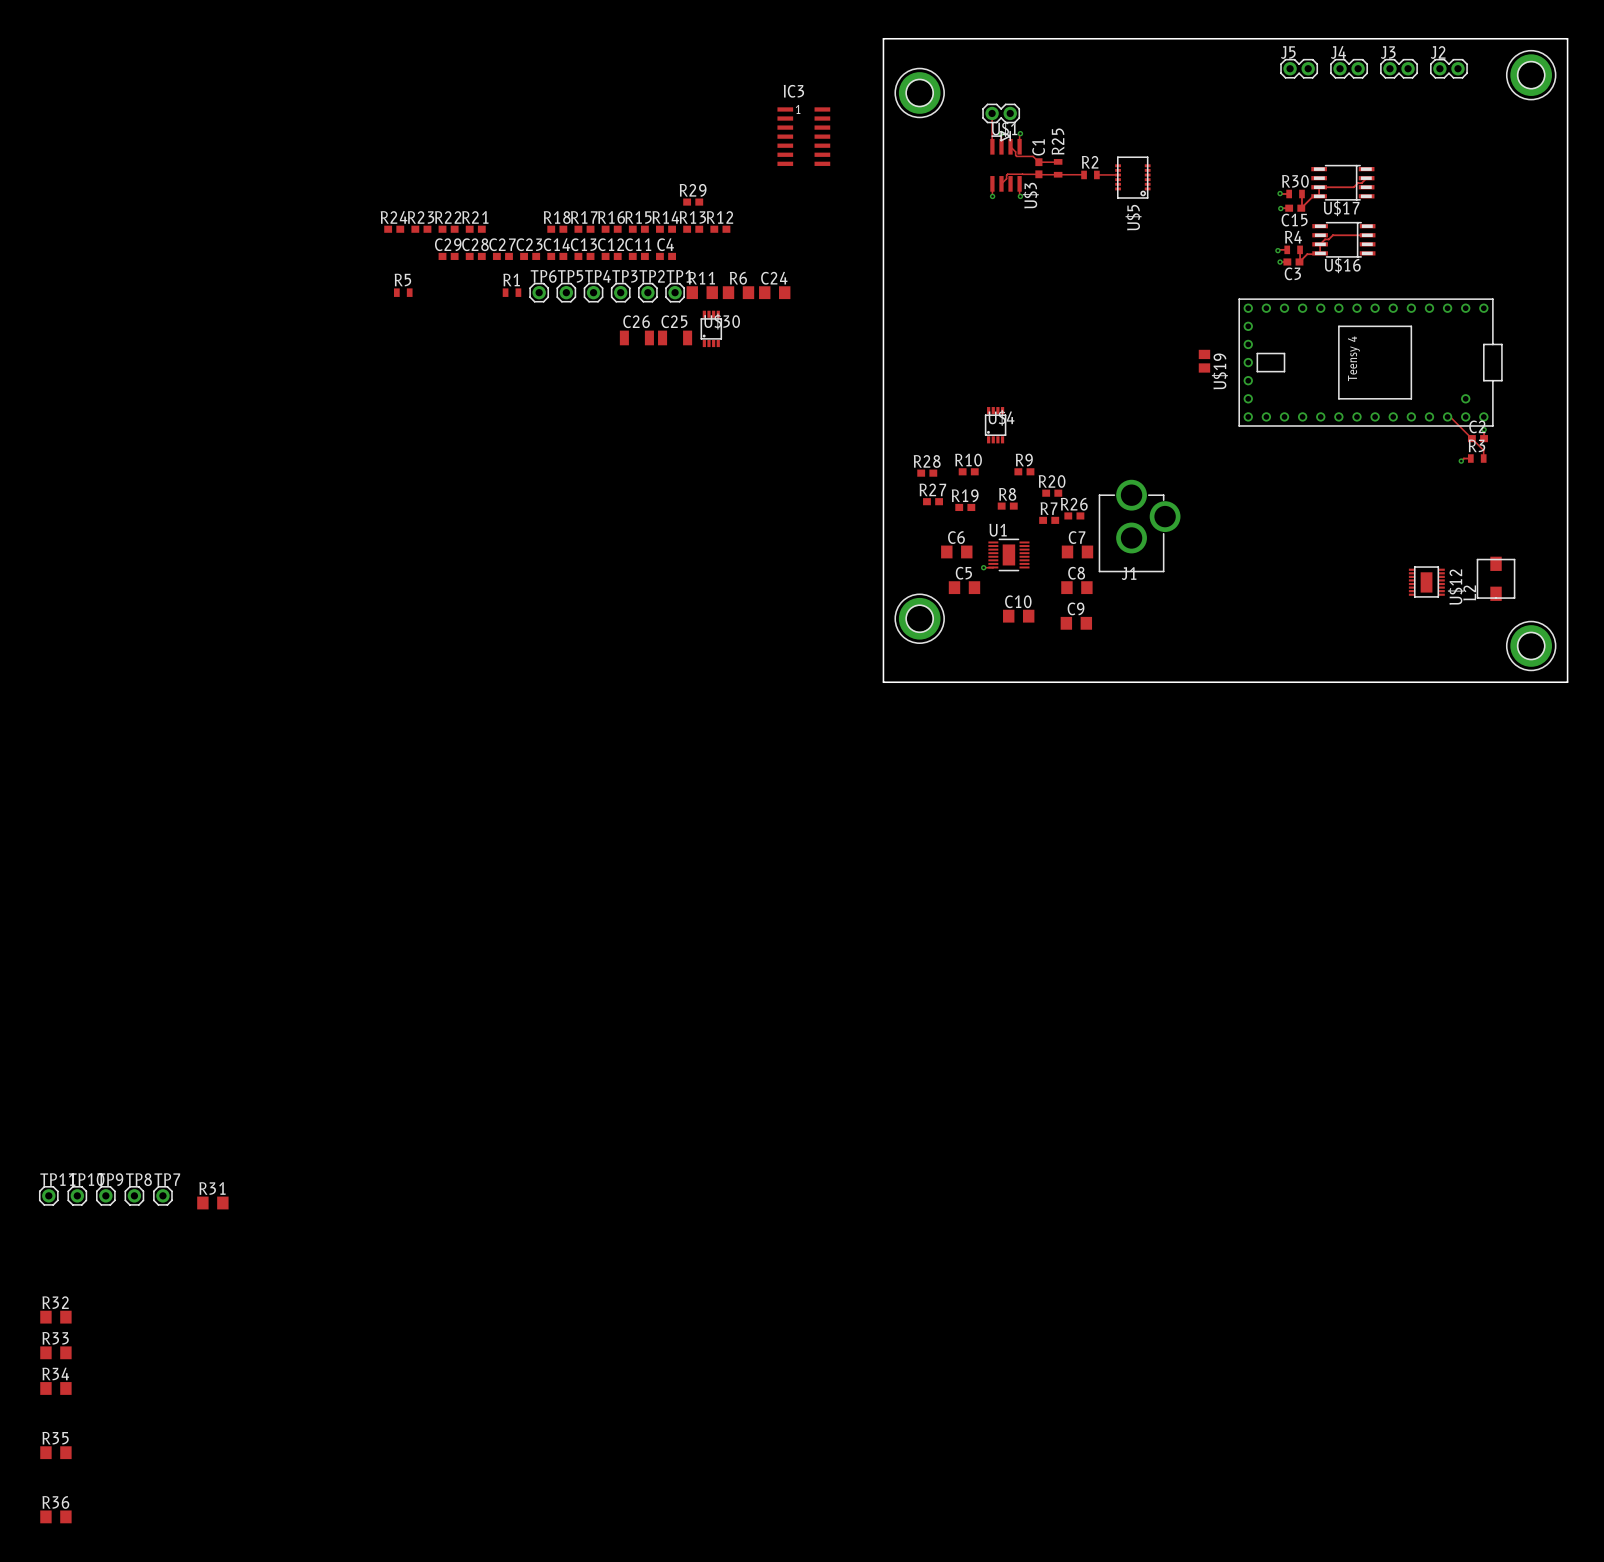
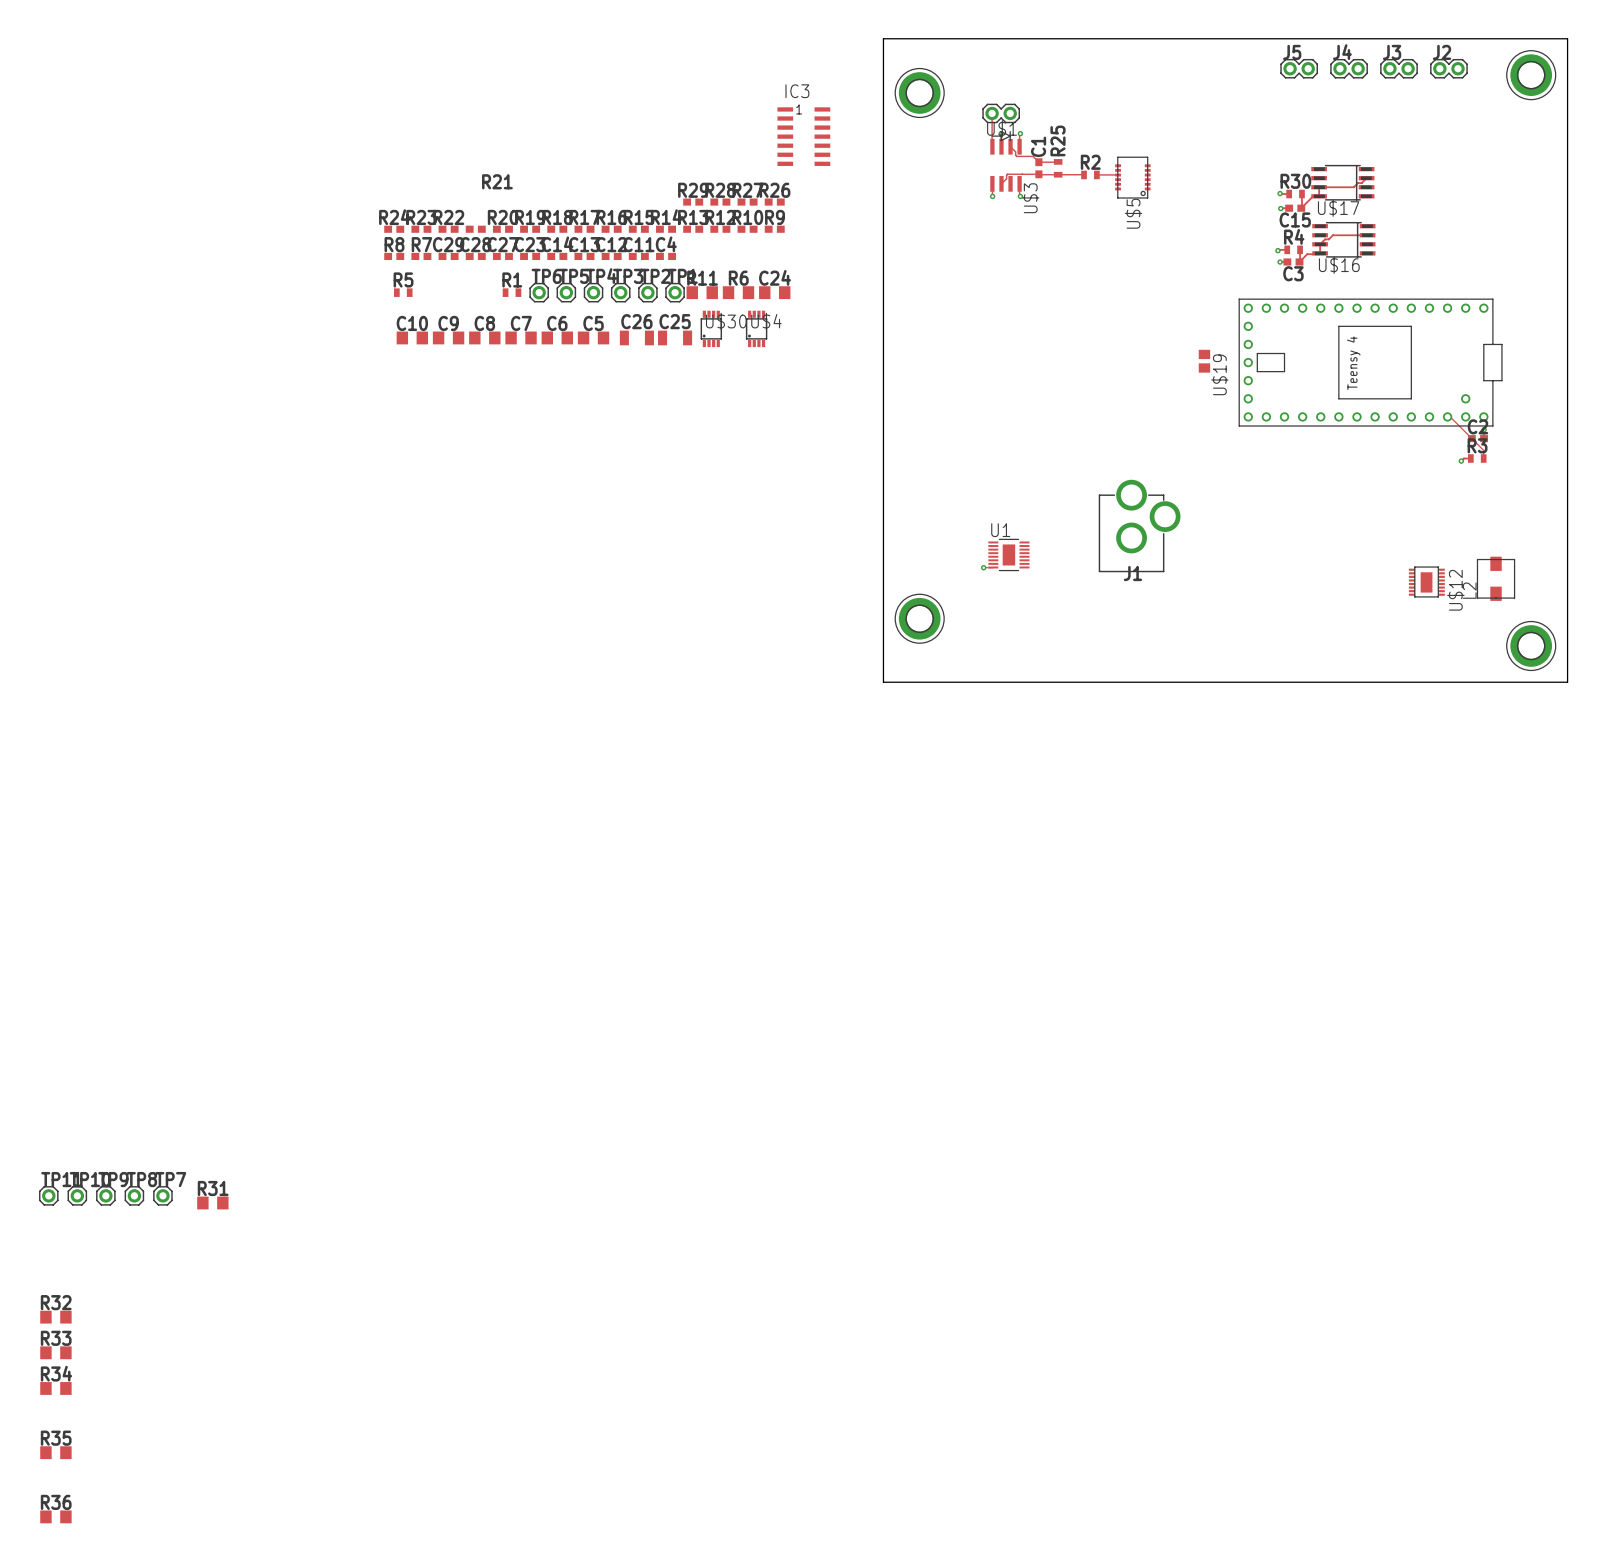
R21 name position: R21 (475, 217) -> R21 (497, 181)
U$4 position: (995, 425) -> (756, 328)
R10 position: (968, 471) -> (747, 229)
R9 position: (1024, 471) -> (774, 229)
R28 position: (927, 473) -> (720, 202)
R20 position: (1052, 493) -> (502, 229)
R27 position: (933, 501) -> (747, 202)
R8 position: (1007, 506) -> (394, 256)
R19 position: (965, 507) -> (530, 229)
R26 position: (1074, 515) -> (774, 202)
R7 position: (1049, 520) -> (421, 256)
C6 position: (956, 551) -> (557, 337)
C7 position: (1077, 551) -> (521, 337)
C5 position: (964, 587) -> (593, 337)
C8 position: (1076, 587) -> (484, 337)
C10 position: (1018, 616) -> (412, 337)
C9 position: (1076, 623) -> (448, 337)

